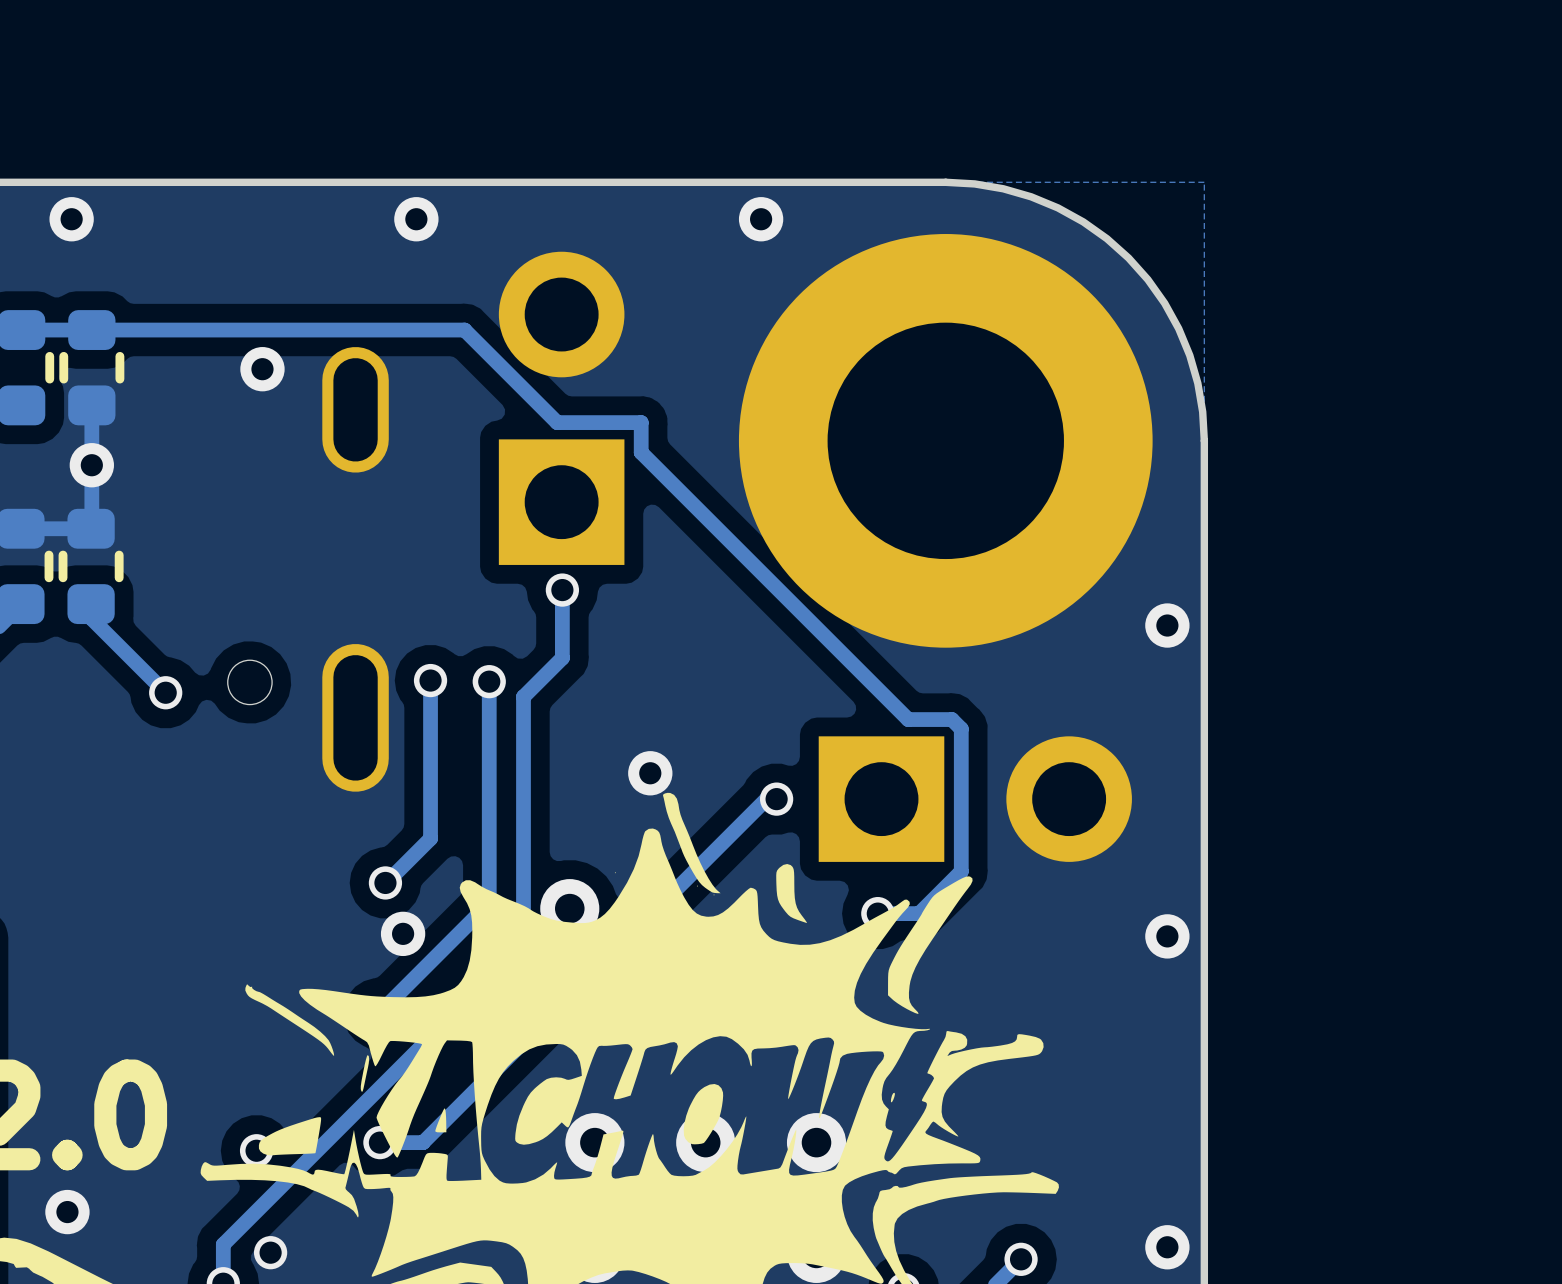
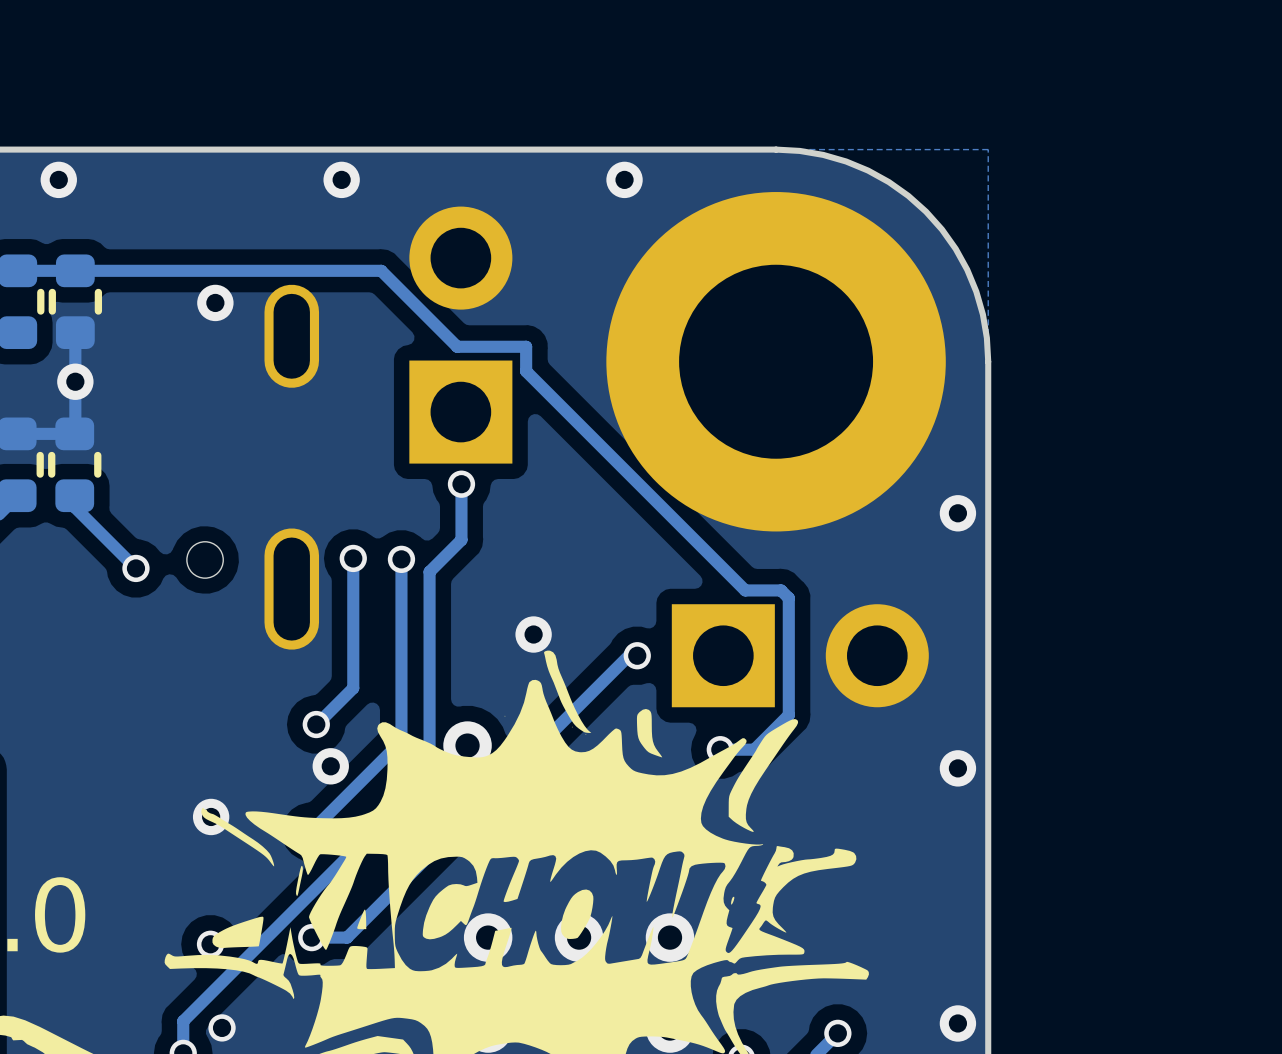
via position: (67, 1212) -> (211, 816)

